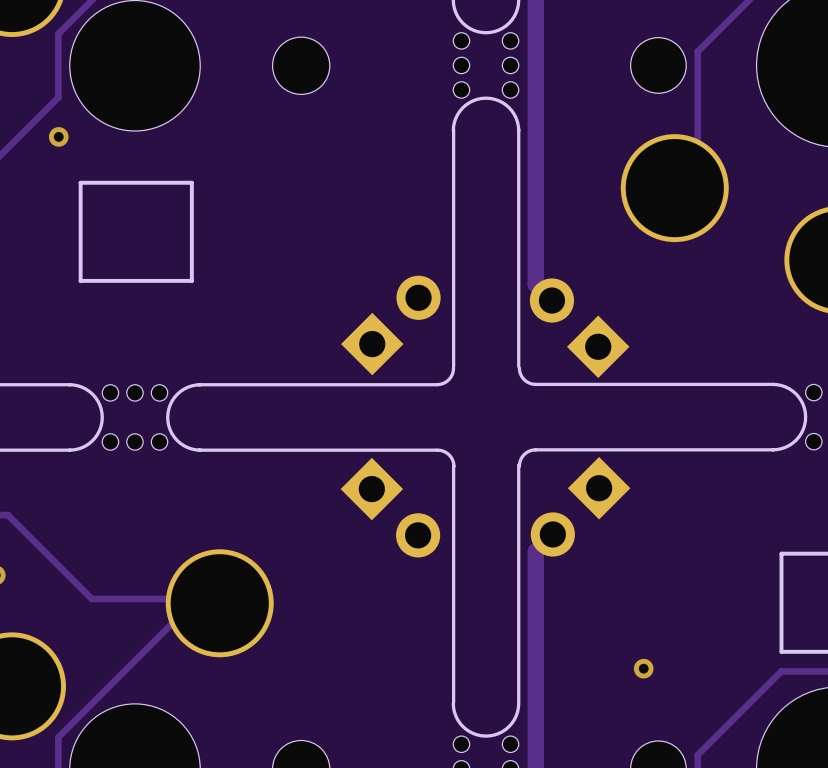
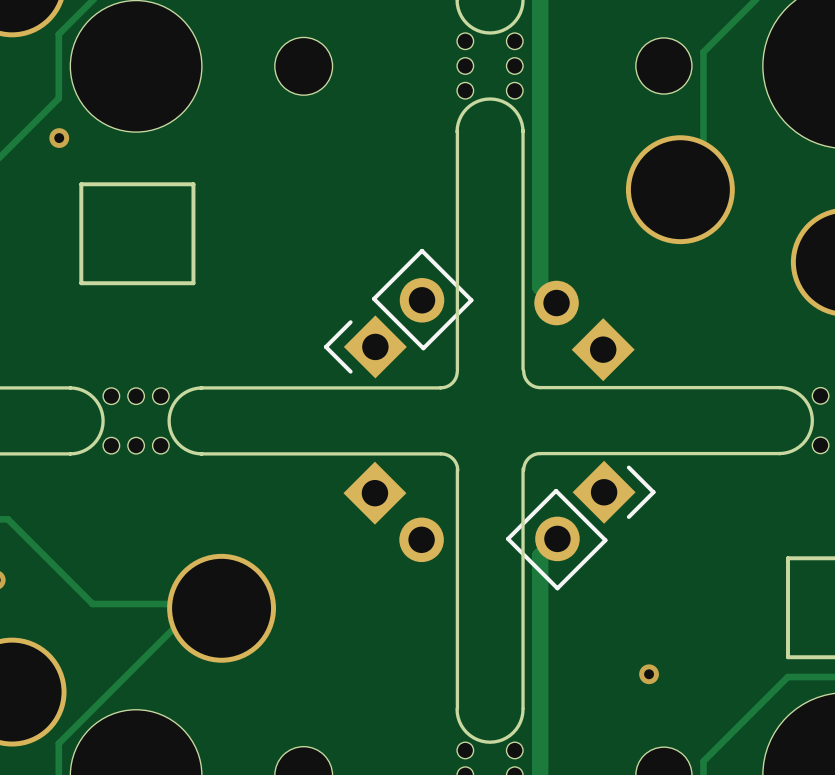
part side: bottom (390, 325) -> top (398, 313)
part side: bottom (580, 506) -> top (580, 525)

